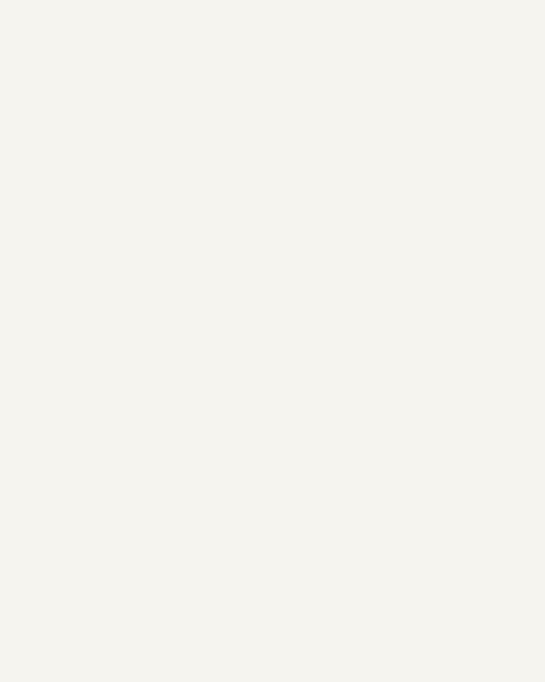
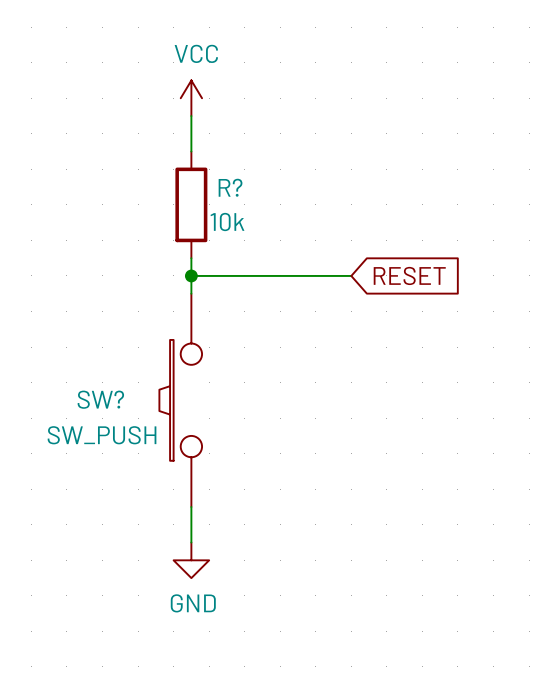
power symbol: none -> VCC (191, 98)
wire: none -> (191, 116) (191, 151)
R?: none -> 10k (191, 204)
wire: none -> (191, 258) (191, 293)
wire: none -> (191, 275) (351, 275)
junction: none -> (191, 275)
global label: none -> RESET (409, 275)
SW?: none -> SW_PUSH (180, 400)
wire: none -> (191, 507) (191, 542)
power symbol: none -> GND (191, 560)

